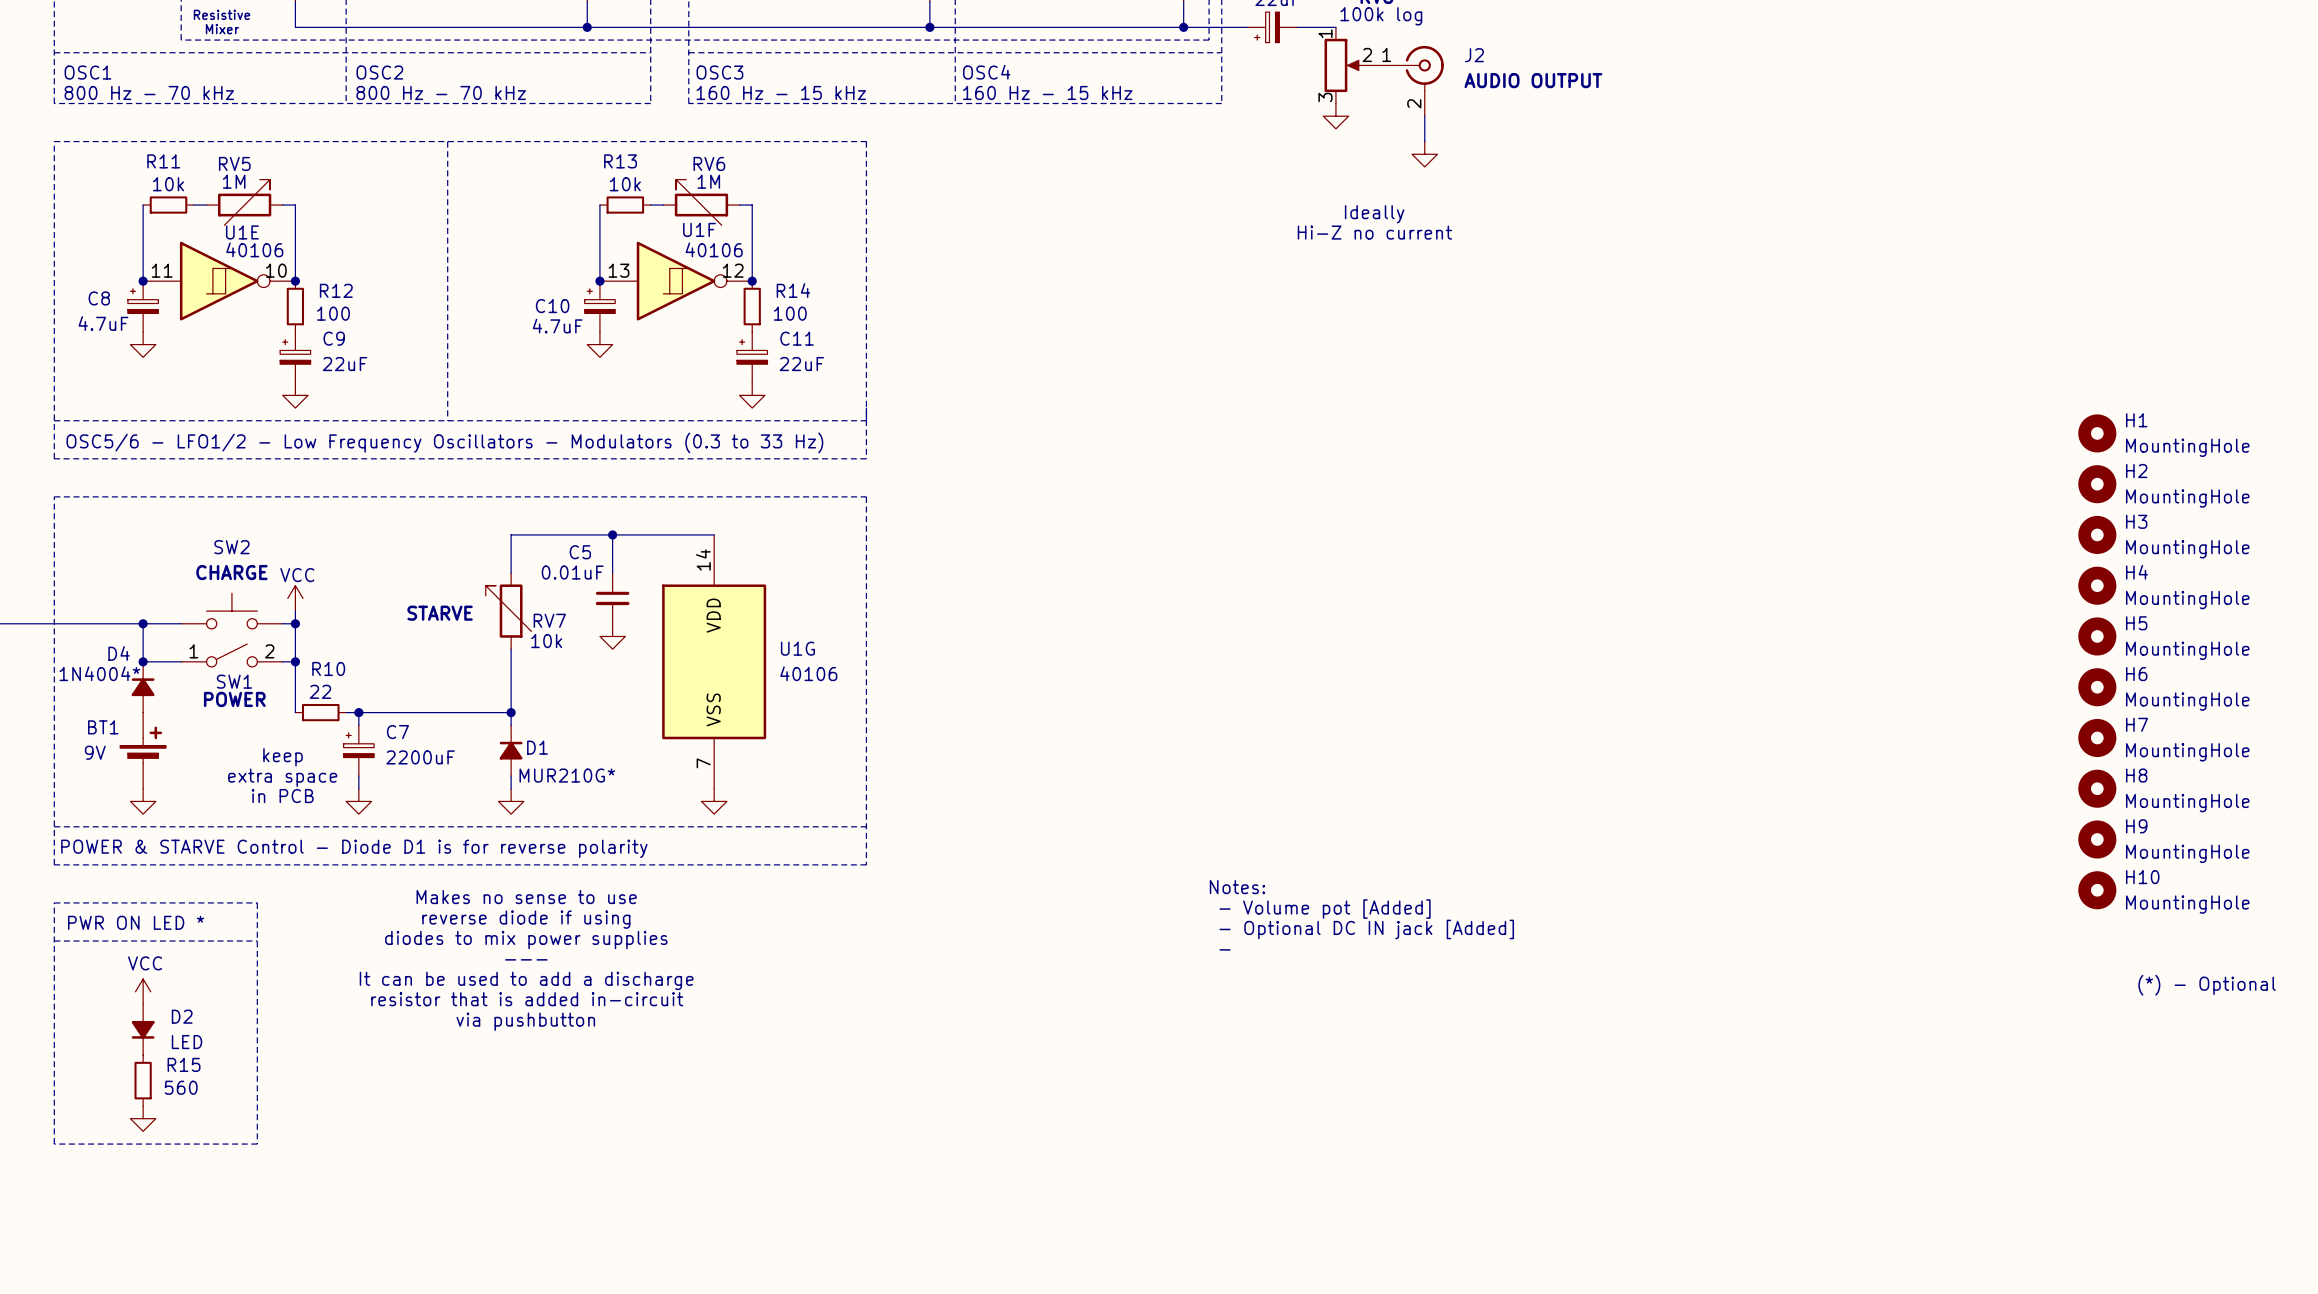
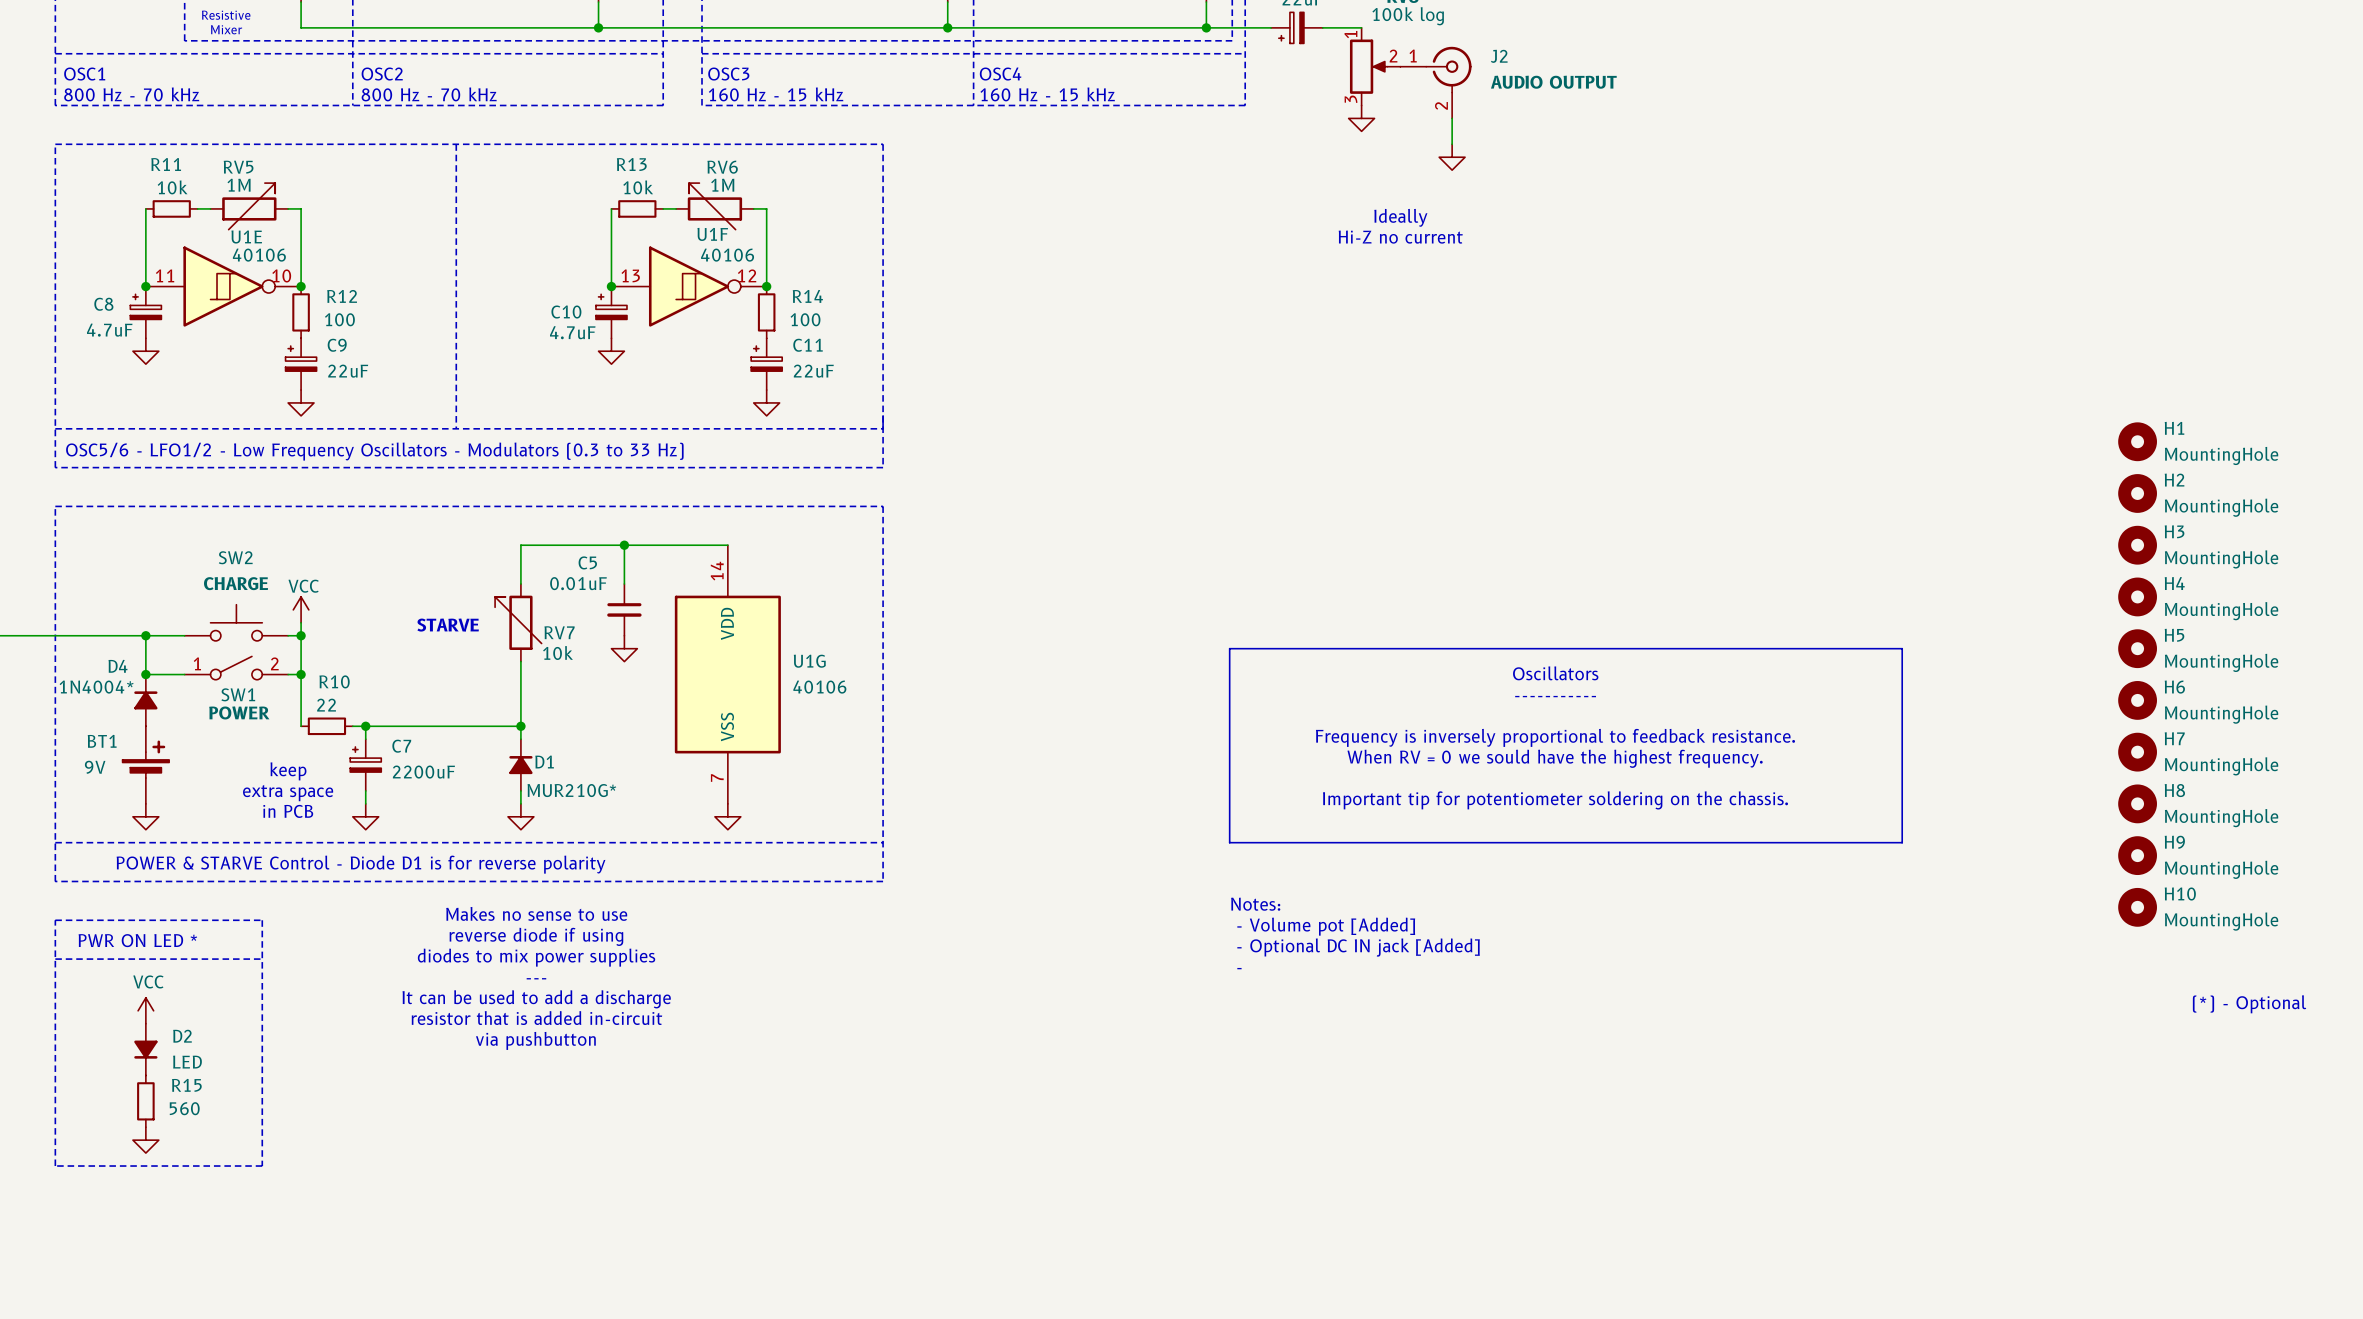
line: none -> (1229, 648) (1902, 648) (1902, 842) (1229, 842) (1229, 648)
text: none -> Oscillators (1555, 673)
text: none -> ----------- (1555, 696)
text: none -> Frequency is inversely proportional to feedback resistance. (1555, 737)
text: none -> When RV = 0 we sould have the highest frequency. (1555, 758)
text: none -> Important tip for potentiometer soldering on the chassis. (1555, 800)

